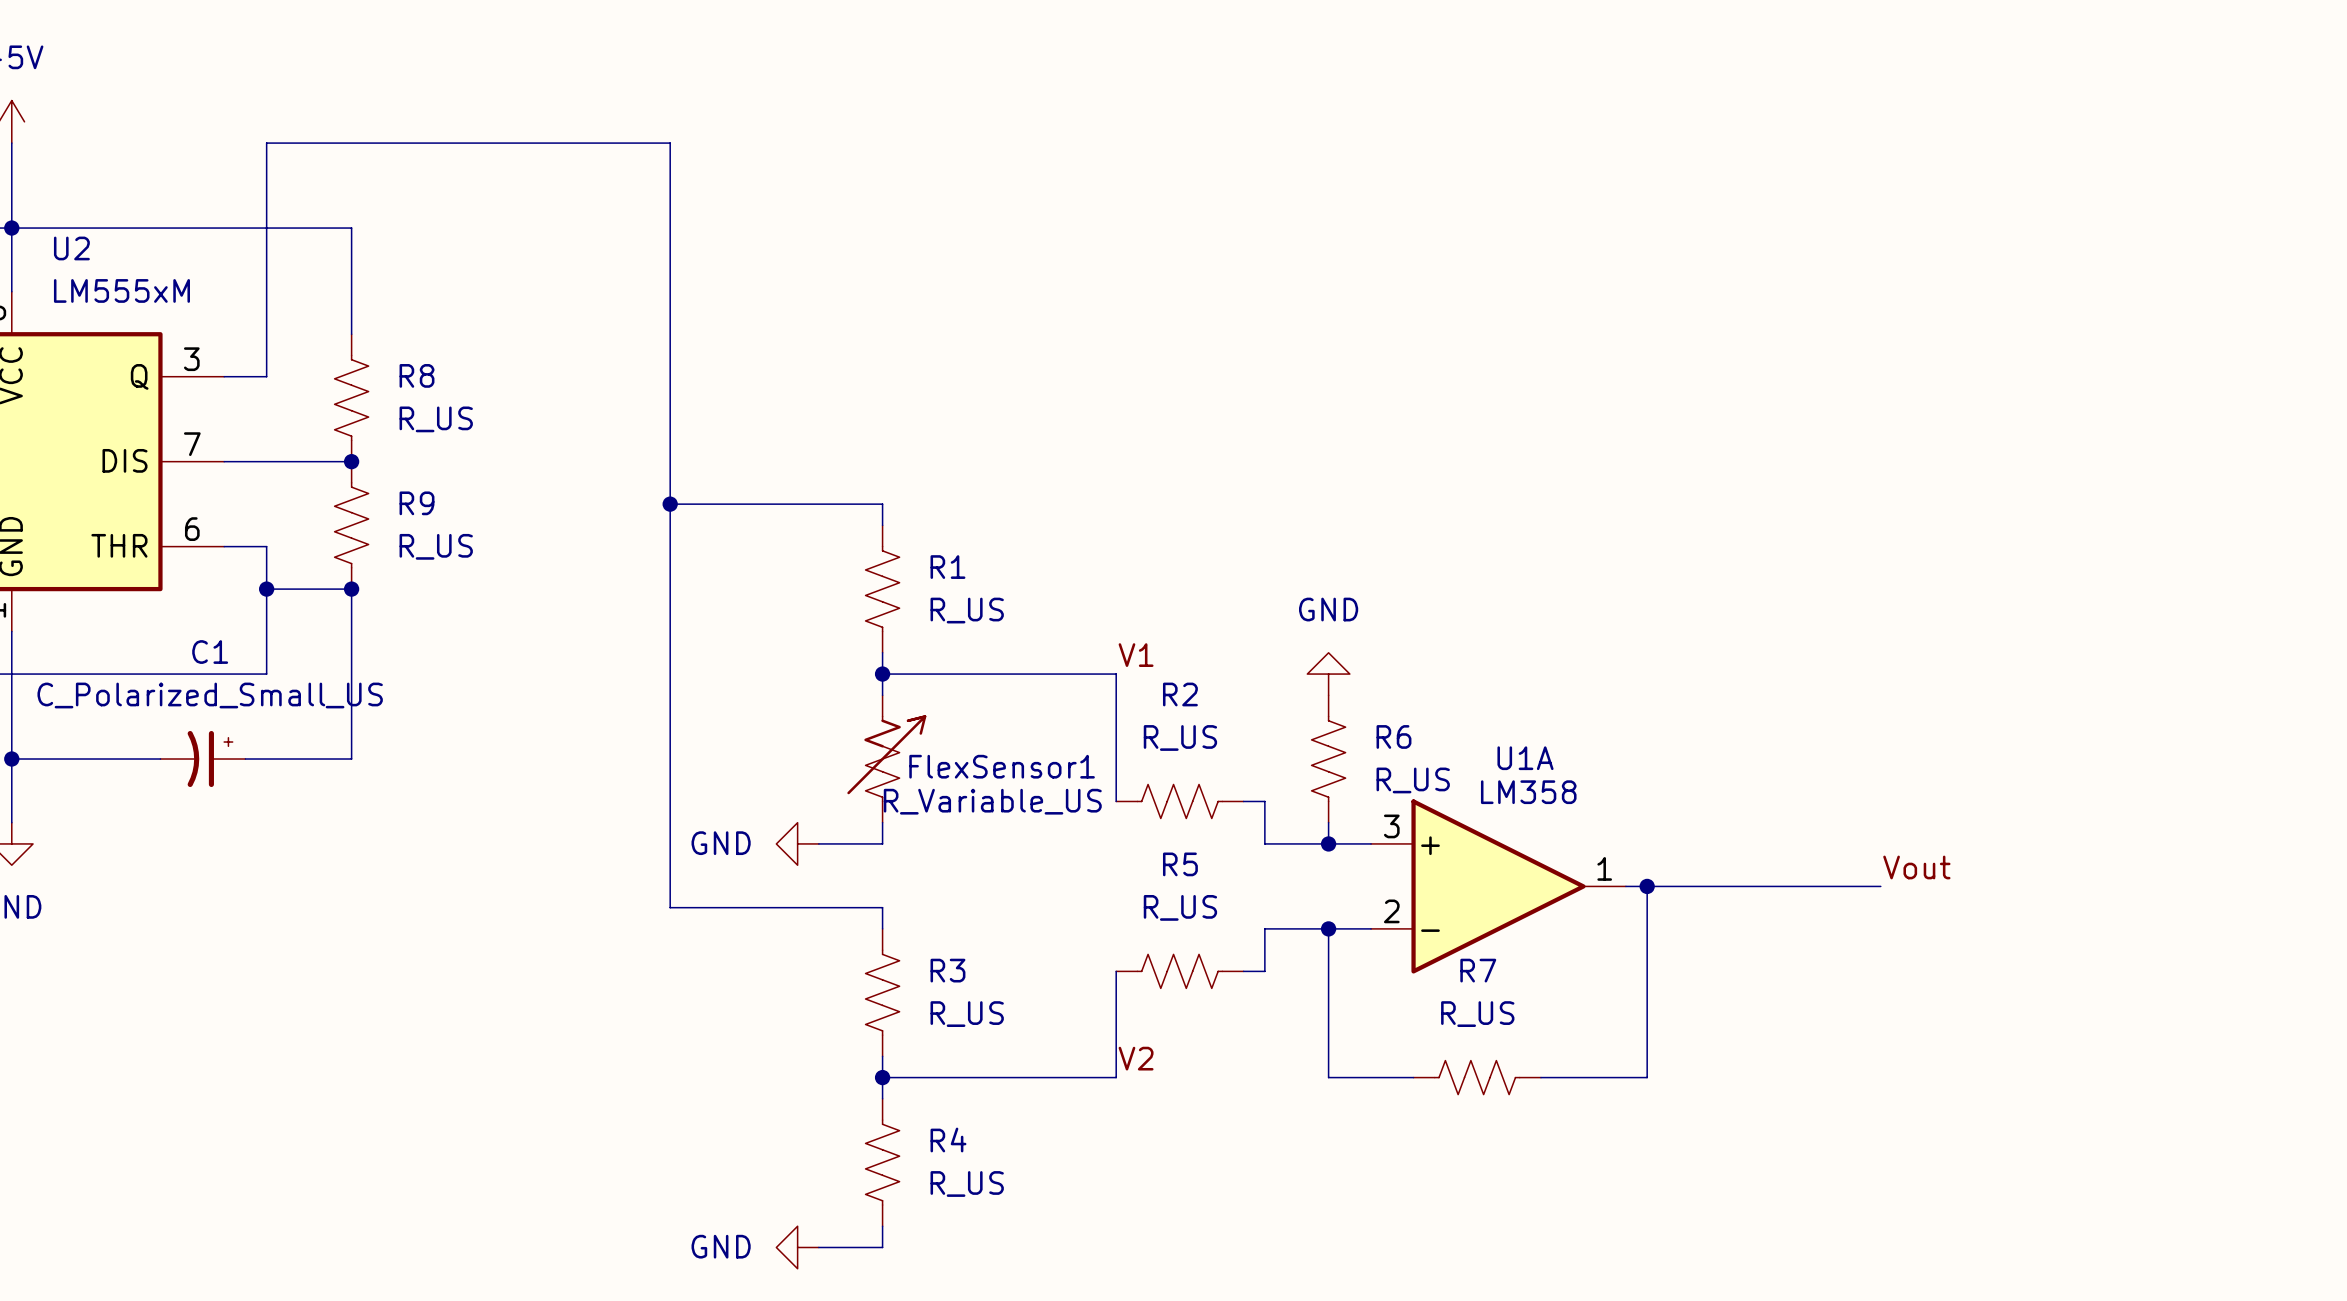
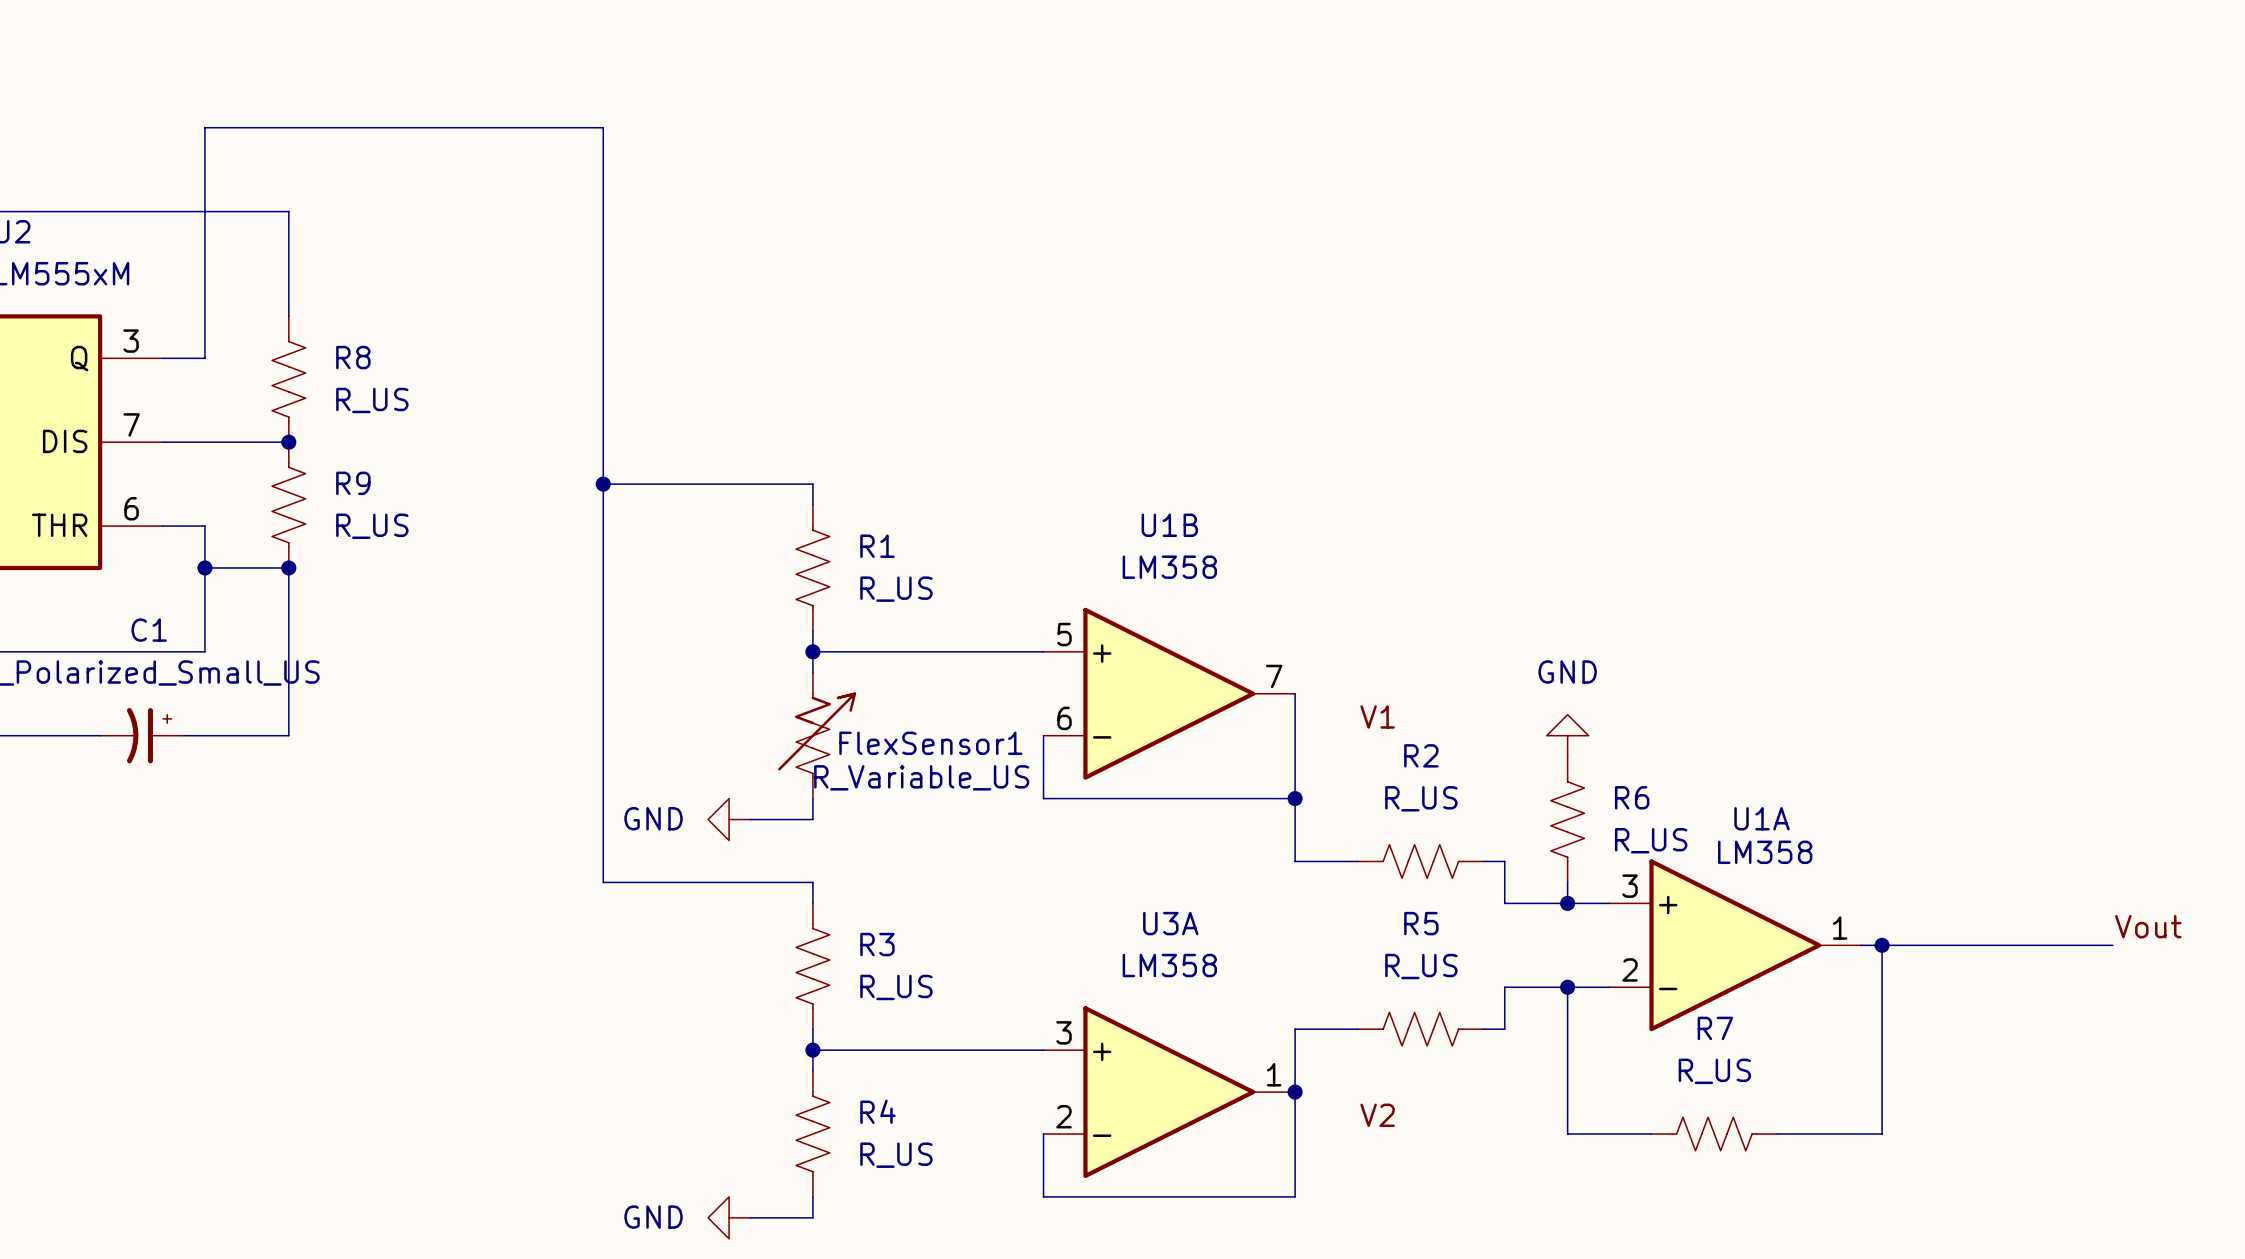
label position: V1 (1136, 655) -> V1 (1377, 716)
wire: (1116, 674) (1116, 759) -> none
power symbol position: GND (1328, 674) -> GND (1567, 735)
U1B: none -> LM358 (1169, 693)
wire: none -> (1295, 693) (1295, 861) (1357, 861)
R6 position: (1328, 759) -> (1567, 819)
wire: none -> (1043, 777) (1043, 798) (1295, 798)
R2 position: (1179, 801) -> (1420, 861)
wire: (1243, 801) (1264, 801) (1264, 843) (1371, 843) -> (1483, 861) (1504, 861) (1504, 903) (1609, 903)
wire: (1328, 822) (1328, 843) -> none
junction position: (1328, 843) -> (1295, 798)
label position: Vout (1916, 867) -> Vout (2148, 926)
U1A position: (1498, 886) -> (1735, 945)
wire: (1625, 886) (1880, 886) -> (1861, 945) (2112, 945)
junction position: (1647, 886) -> (1567, 903)
wire: (1328, 928) (1328, 1077) (1413, 1077) -> none
junction: (1328, 928) -> none
wire: (1371, 928) (1264, 928) (1264, 971) (1243, 971) -> (1609, 987) (1504, 987) (1504, 1029) (1483, 1029)
wire: (1647, 928) (1647, 1013) -> none
wire: (1116, 971) (1116, 1077) -> none
R5 position: (1179, 971) -> (1420, 1029)
wire: none -> (1882, 945) (1882, 1134) (1777, 1134)
junction: none -> (1882, 945)
junction: none -> (1567, 987)
wire: none -> (1357, 1029) (1295, 1029) (1295, 1196) (1043, 1196) (1043, 1134)
label position: V2 (1136, 1058) -> V2 (1377, 1115)
R7 position: (1477, 1077) -> (1714, 1134)
wire: (1540, 1077) (1647, 1077) -> (1651, 1134) (1567, 1134) (1567, 1050)
U3A: none -> LM358 (1169, 1092)
junction: none -> (1295, 1092)

